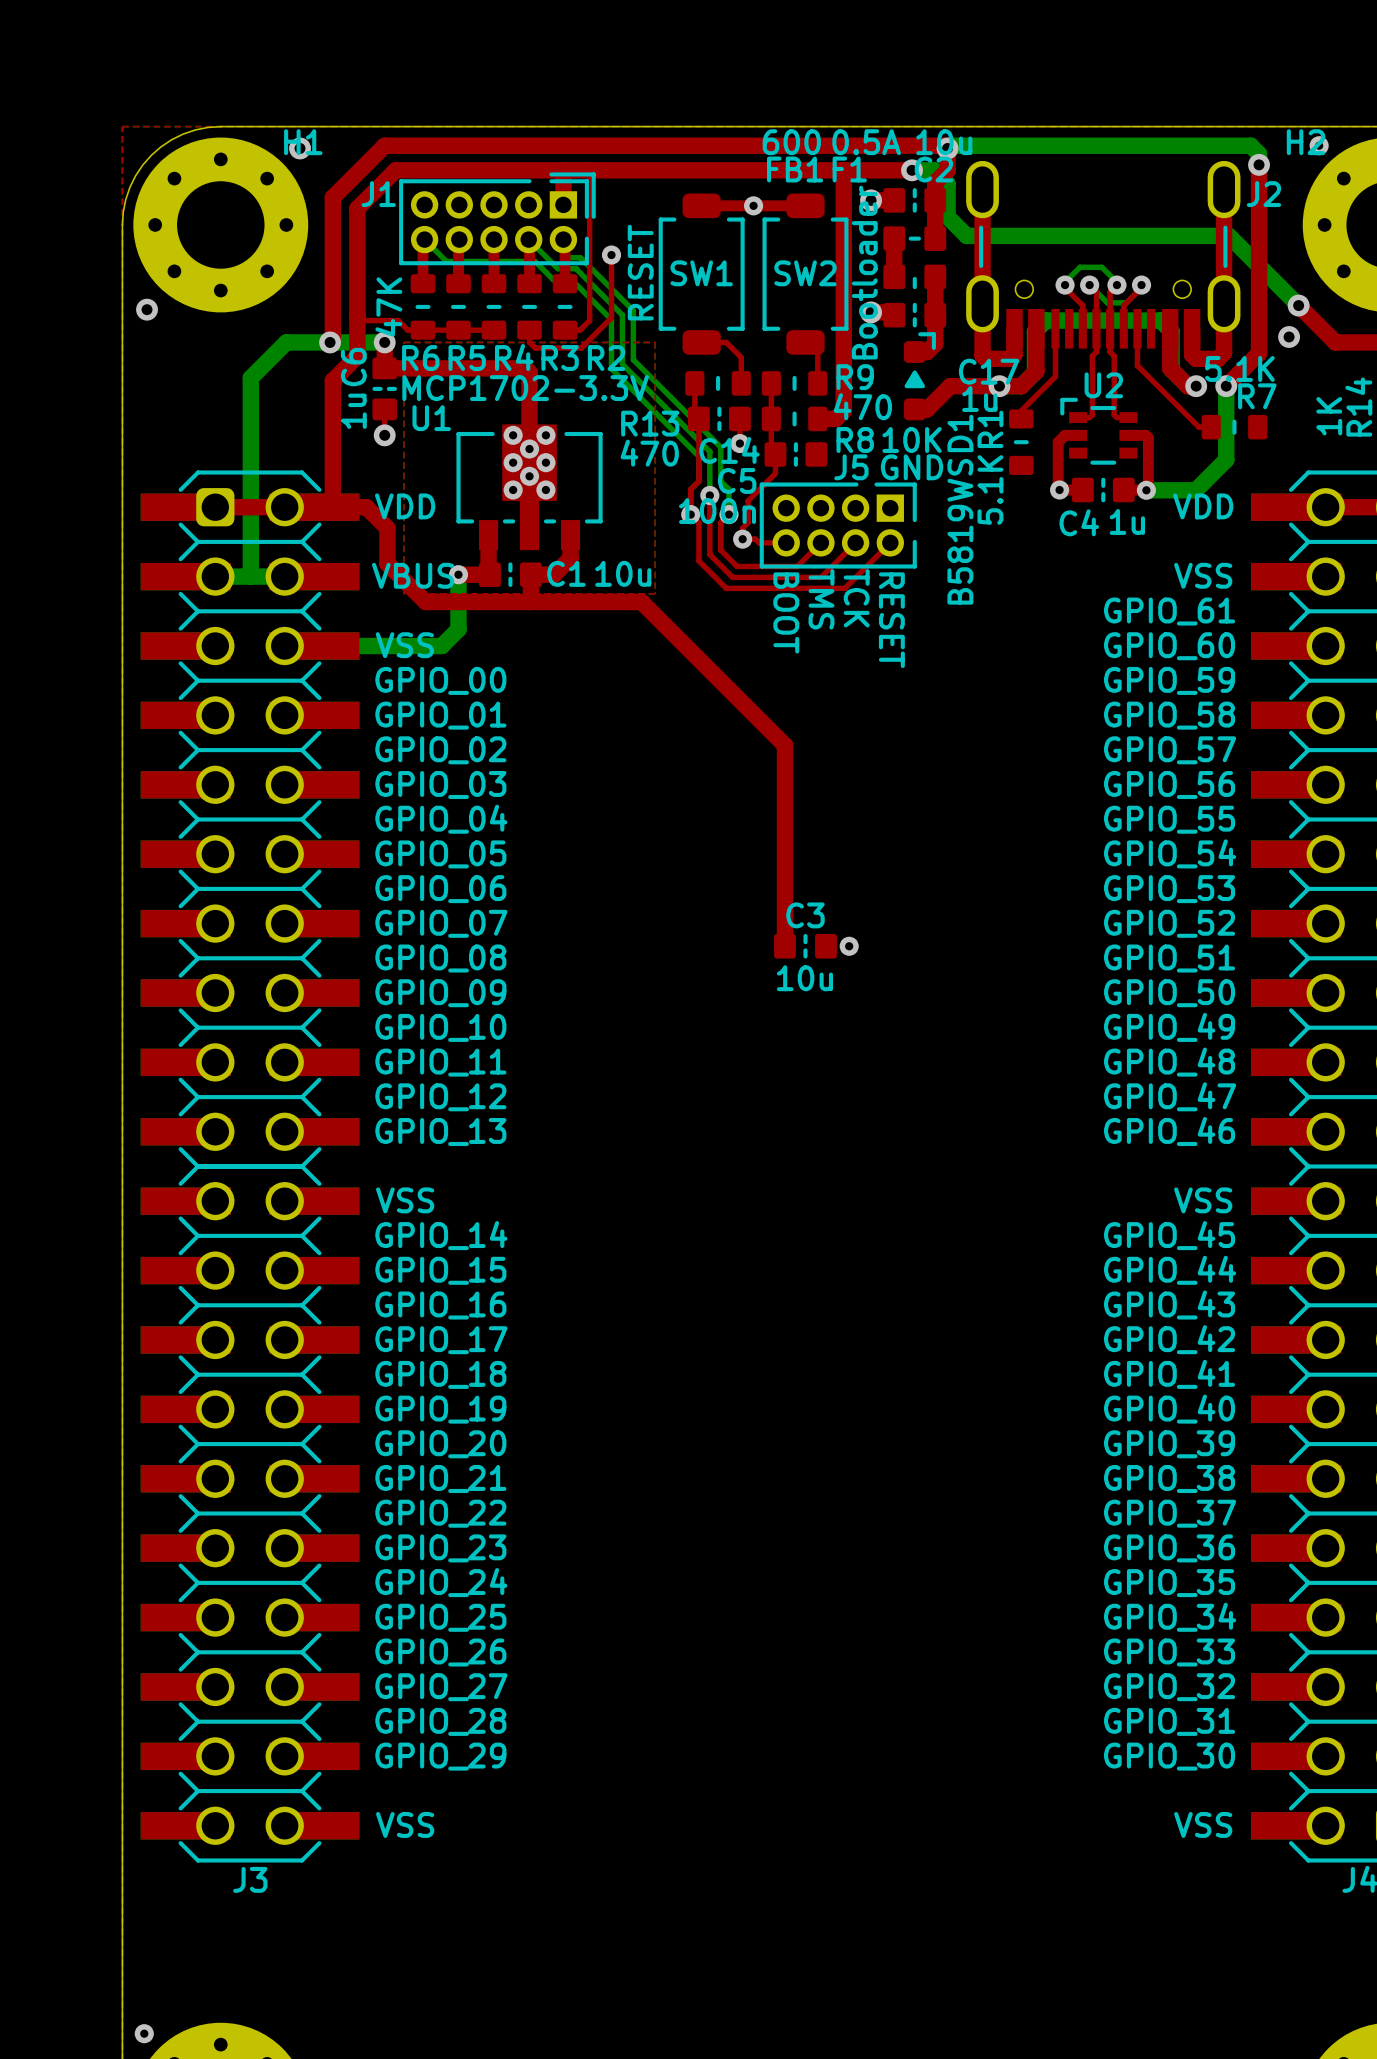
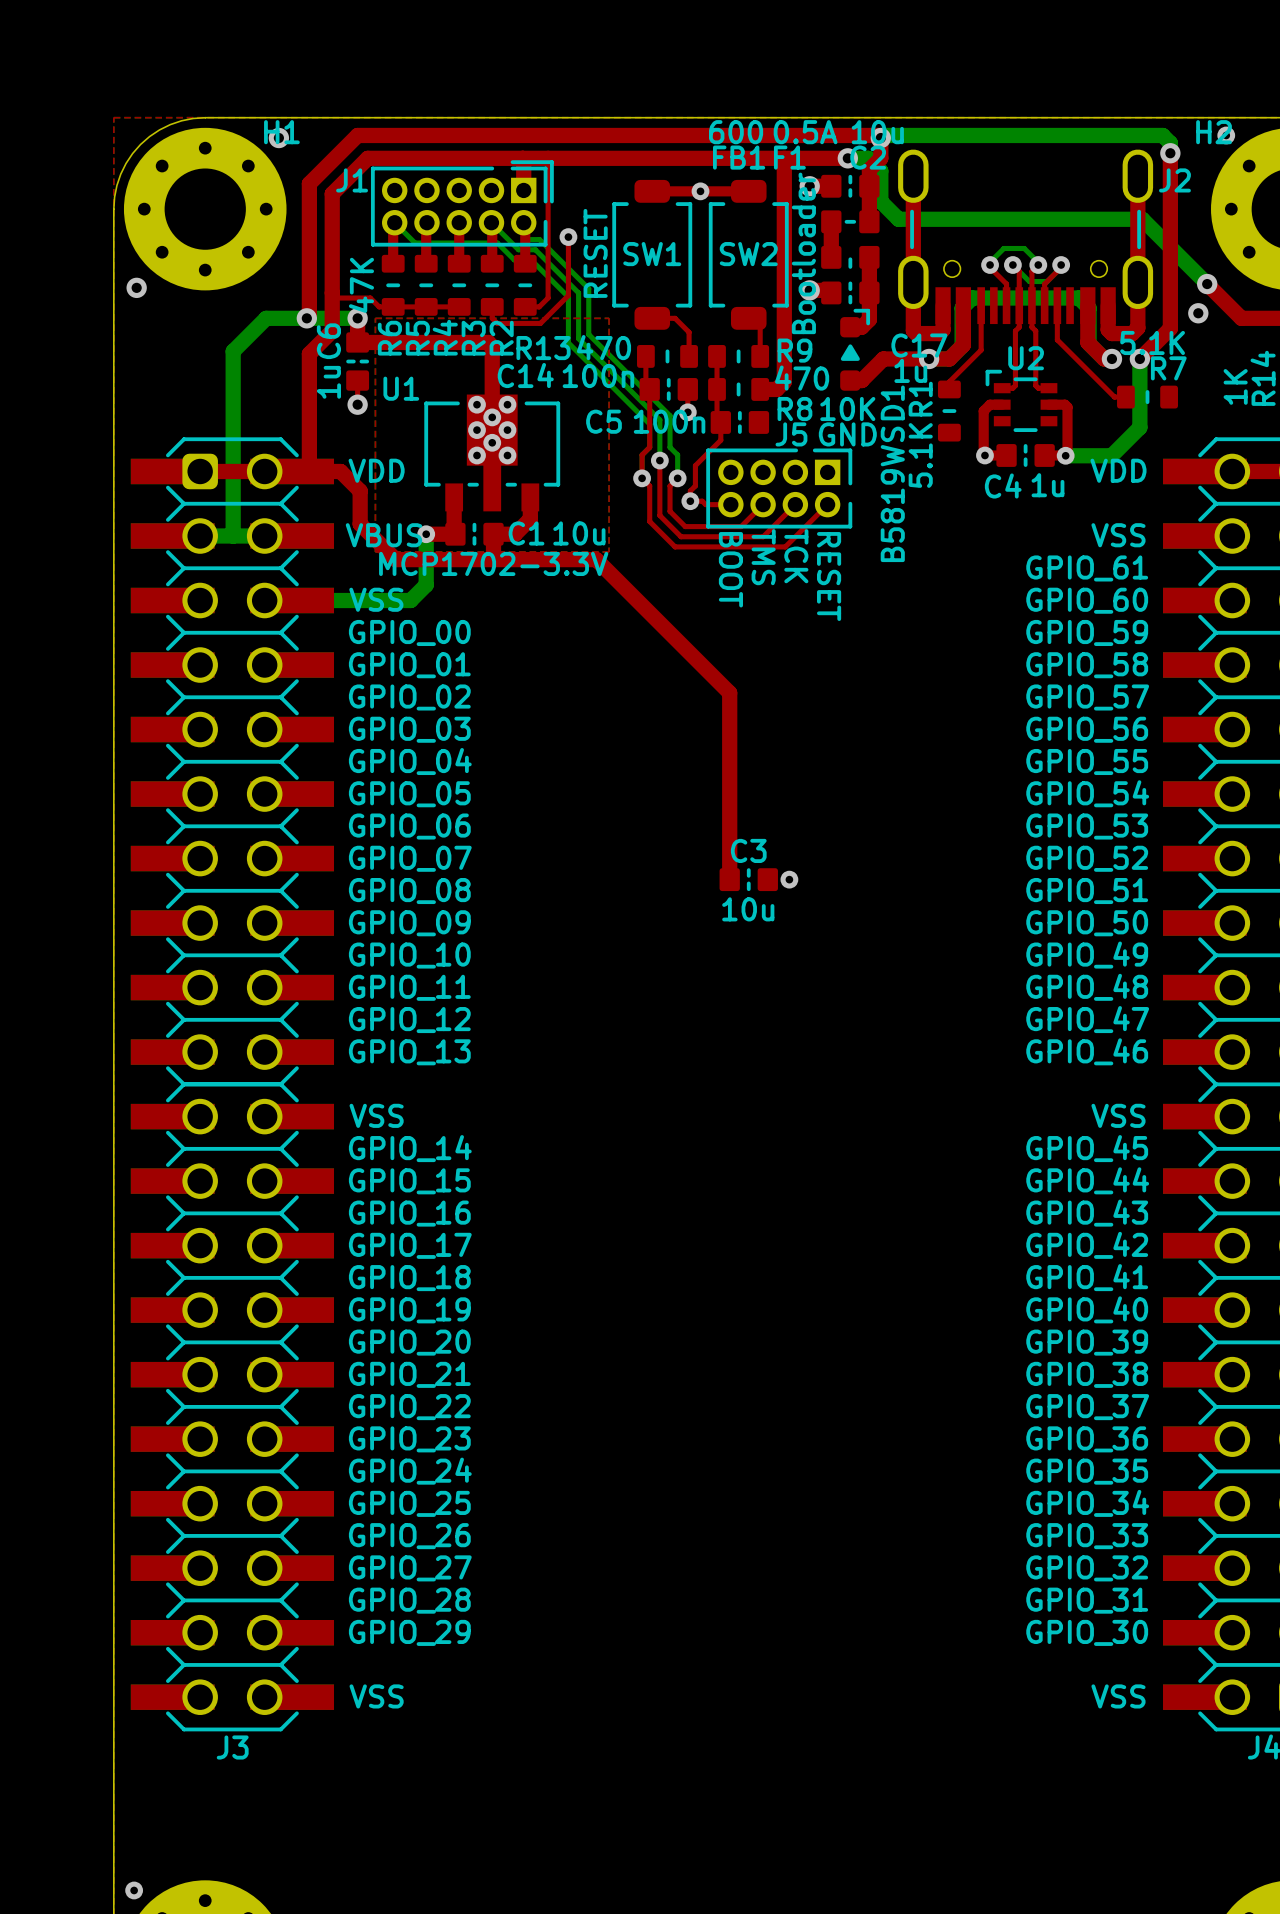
R4 name rotation: 0° (514, 357) -> 90° counterclockwise (445, 337)
R6 name rotation: 0° (420, 358) -> 90° counterclockwise (389, 338)
R5 name rotation: 0° (467, 358) -> 90° counterclockwise (417, 338)
R3 name rotation: 0° (560, 358) -> 90° counterclockwise (473, 338)
R2 name rotation: 0° (606, 358) -> 90° counterclockwise (501, 338)
R2 name position: R2 (606, 358) -> R2 (501, 338)
U1 value position: MCP1702-3.3V (525, 388) -> MCP1702-3.3V (493, 563)
C14 value: none -> 100n (598, 375)
R13 name position: R13 (650, 423) -> R13 (543, 348)
C14 name position: C14 (729, 450) -> C14 (525, 375)
R13 value position: 470 (649, 453) -> 470 (603, 347)
C5 name position: C5 (737, 480) -> C5 (603, 421)
C5 value position: 100n (717, 511) -> 100n (669, 421)

